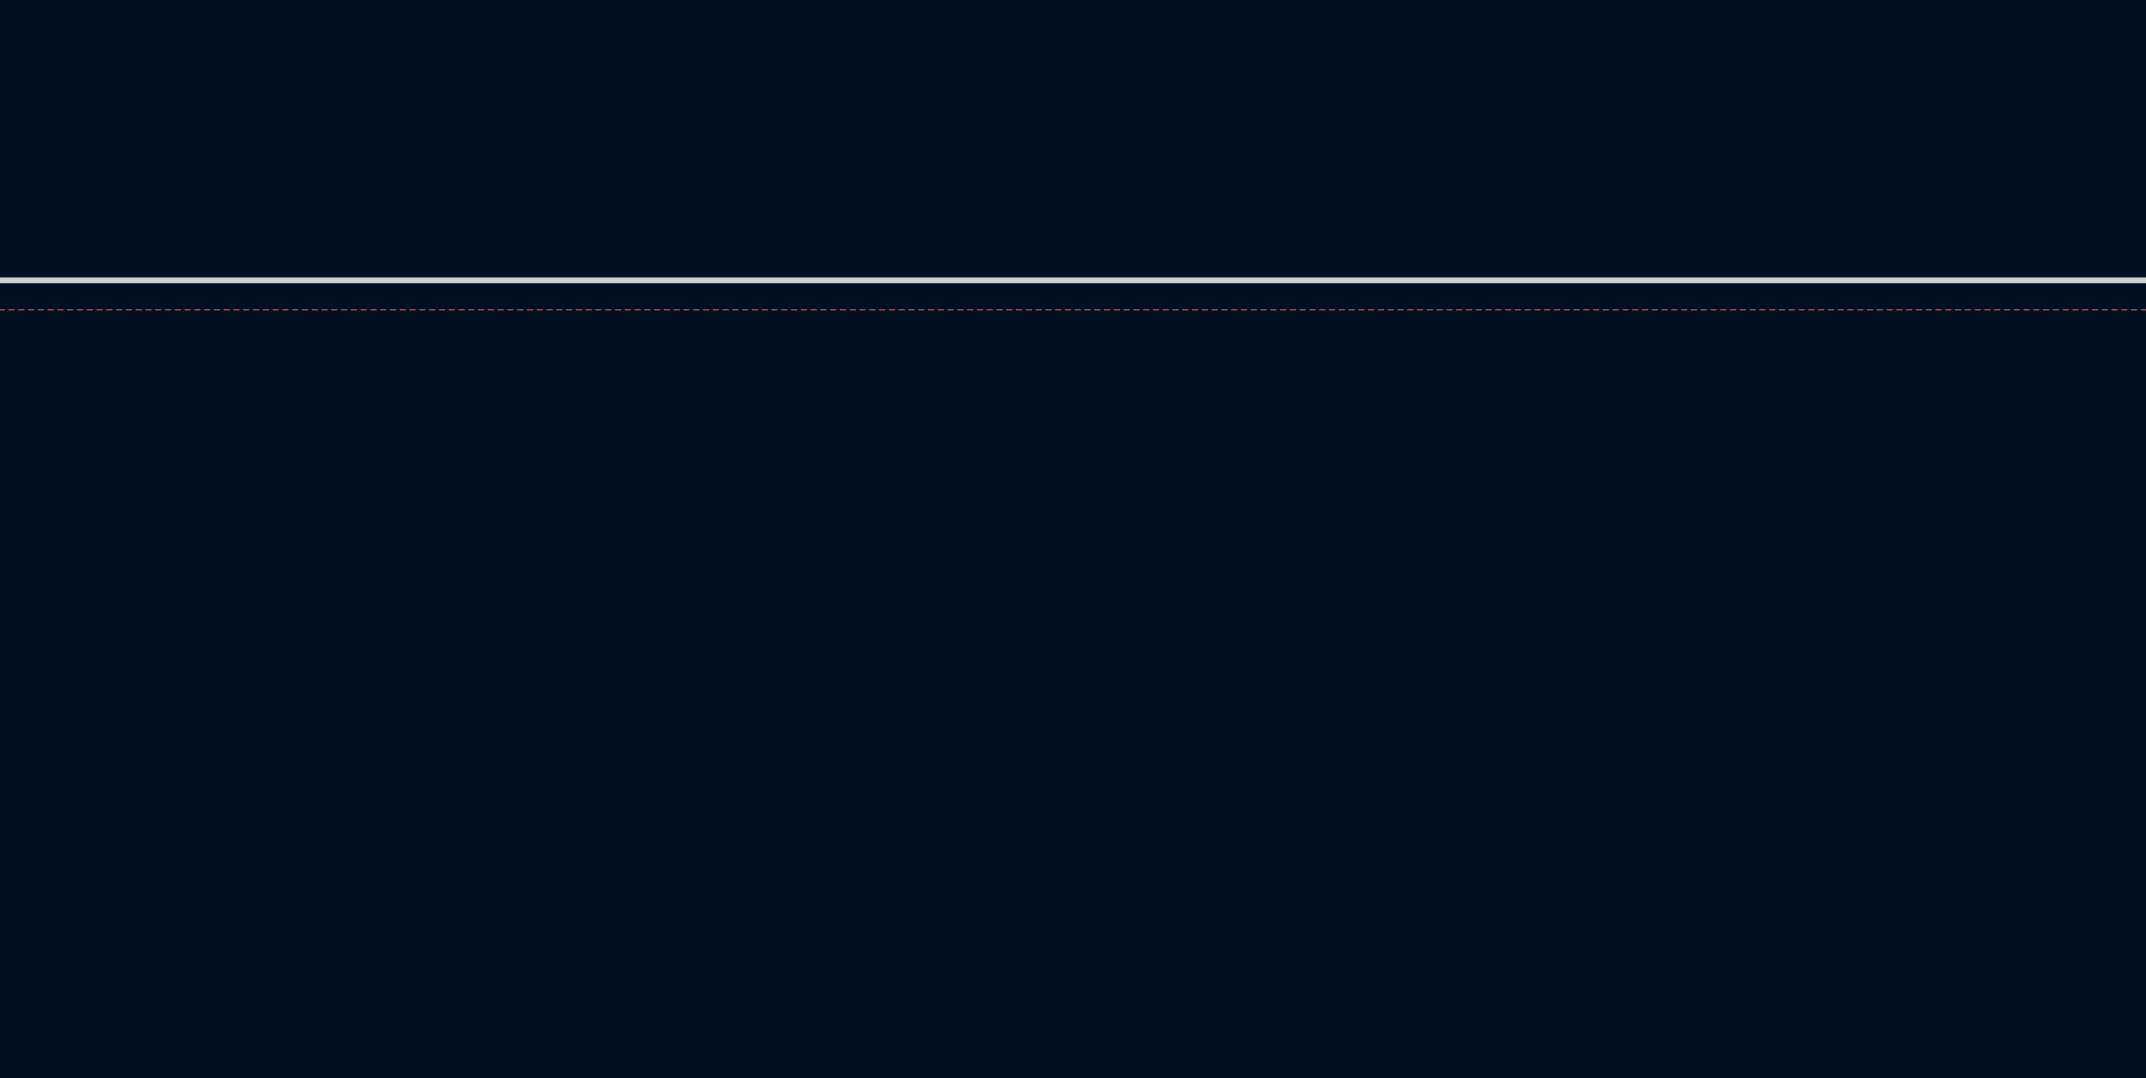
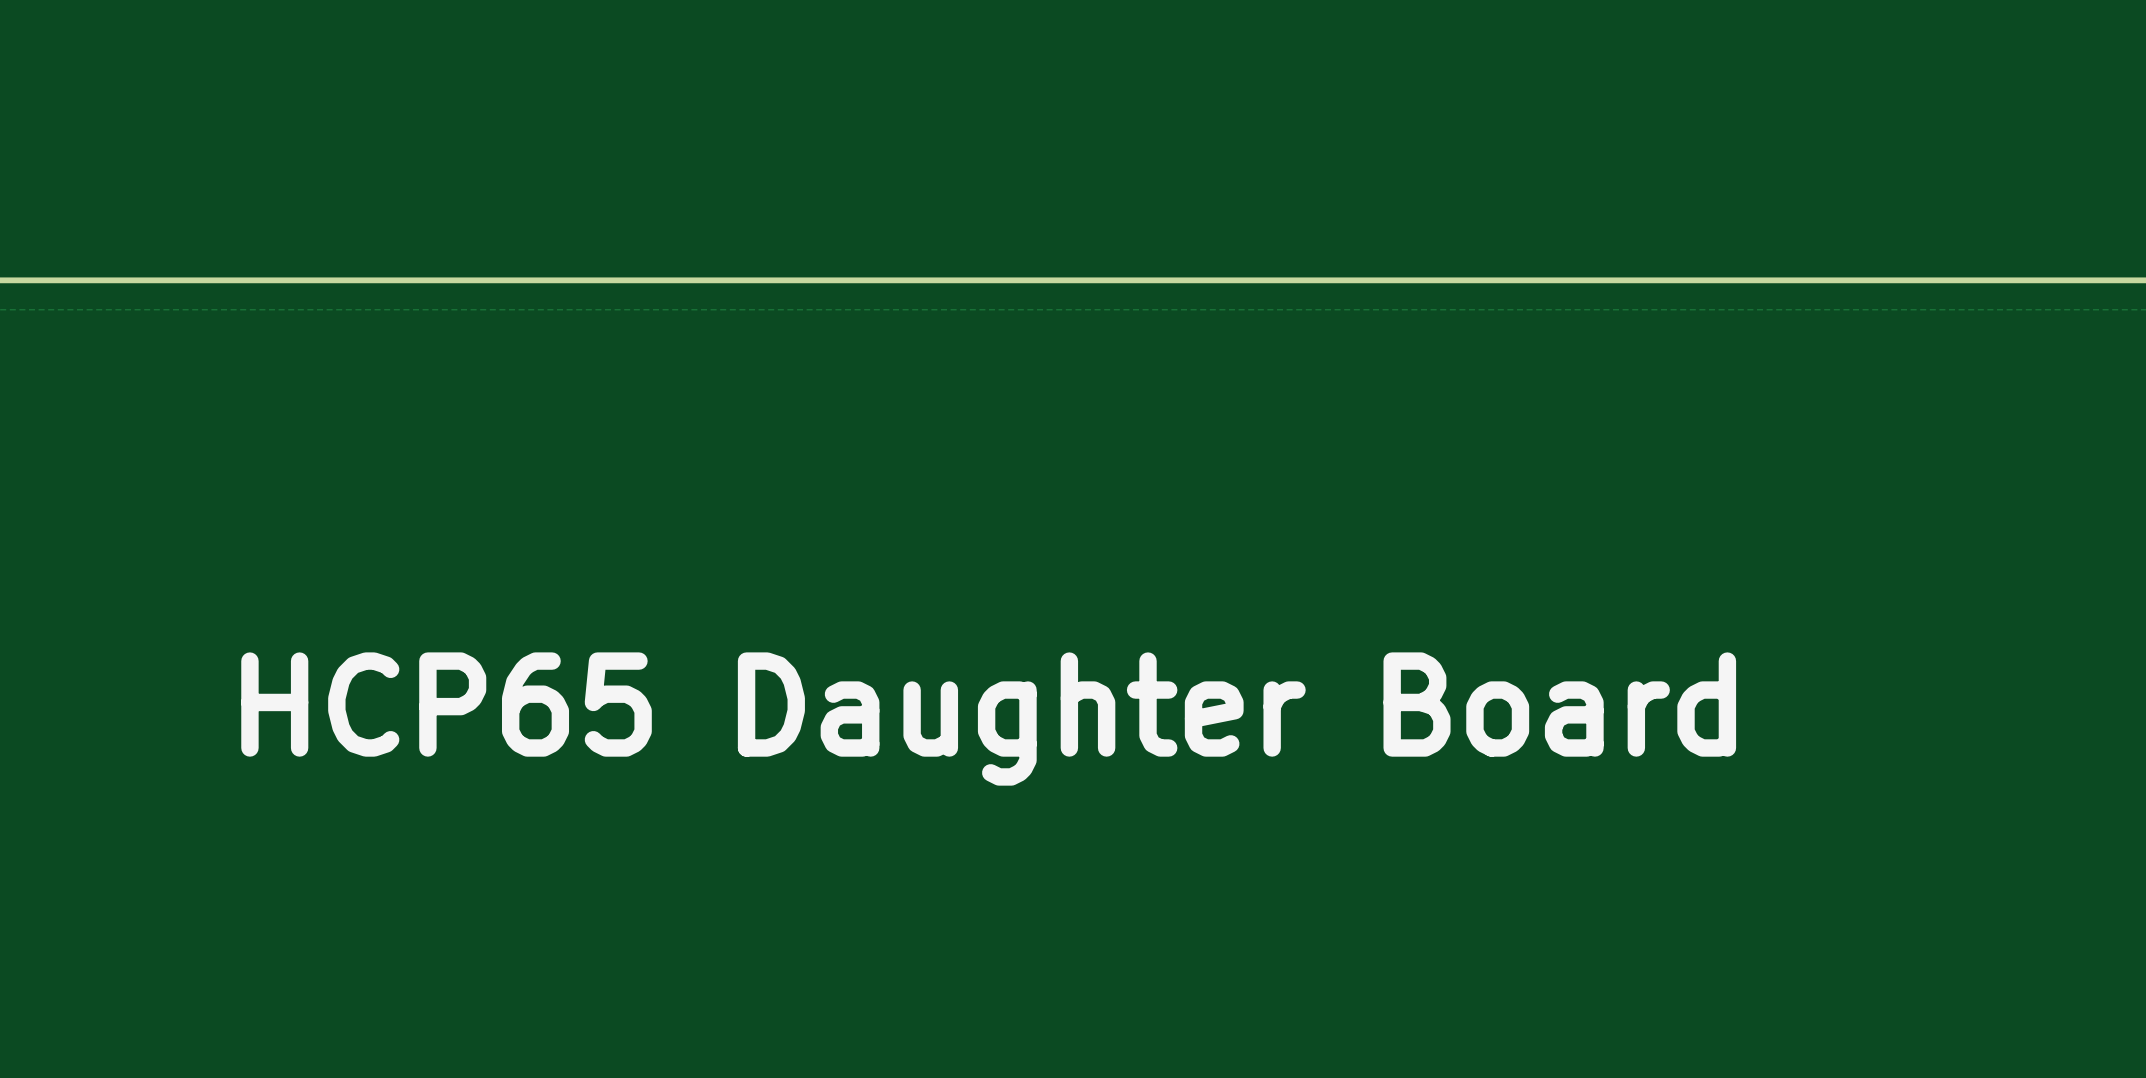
text: none -> HCP65 Daughter Board (988, 719)

